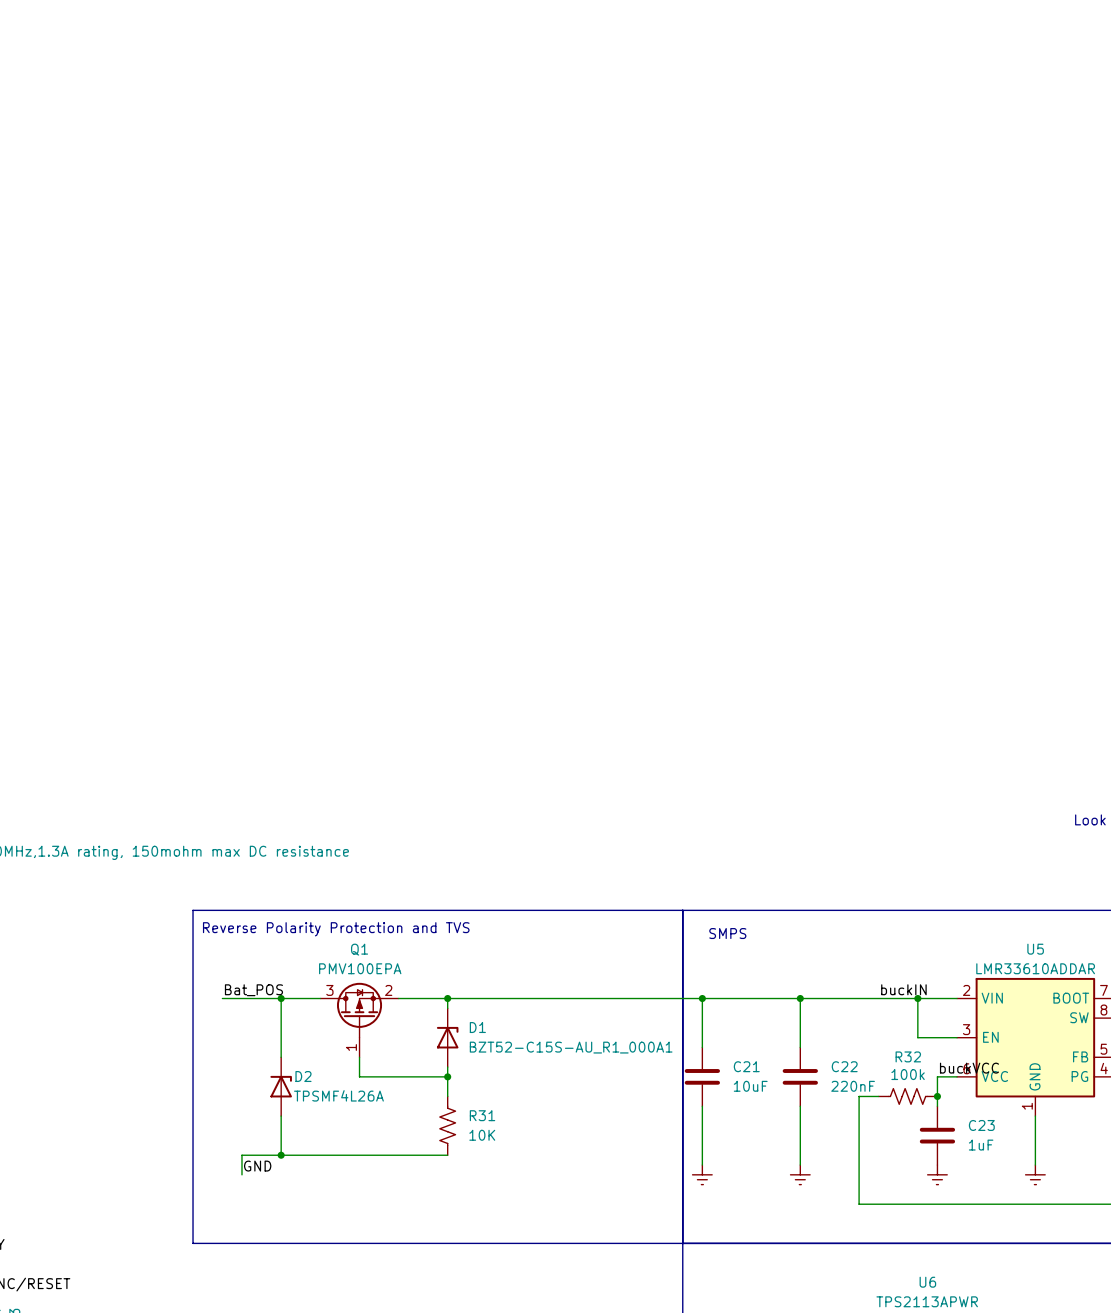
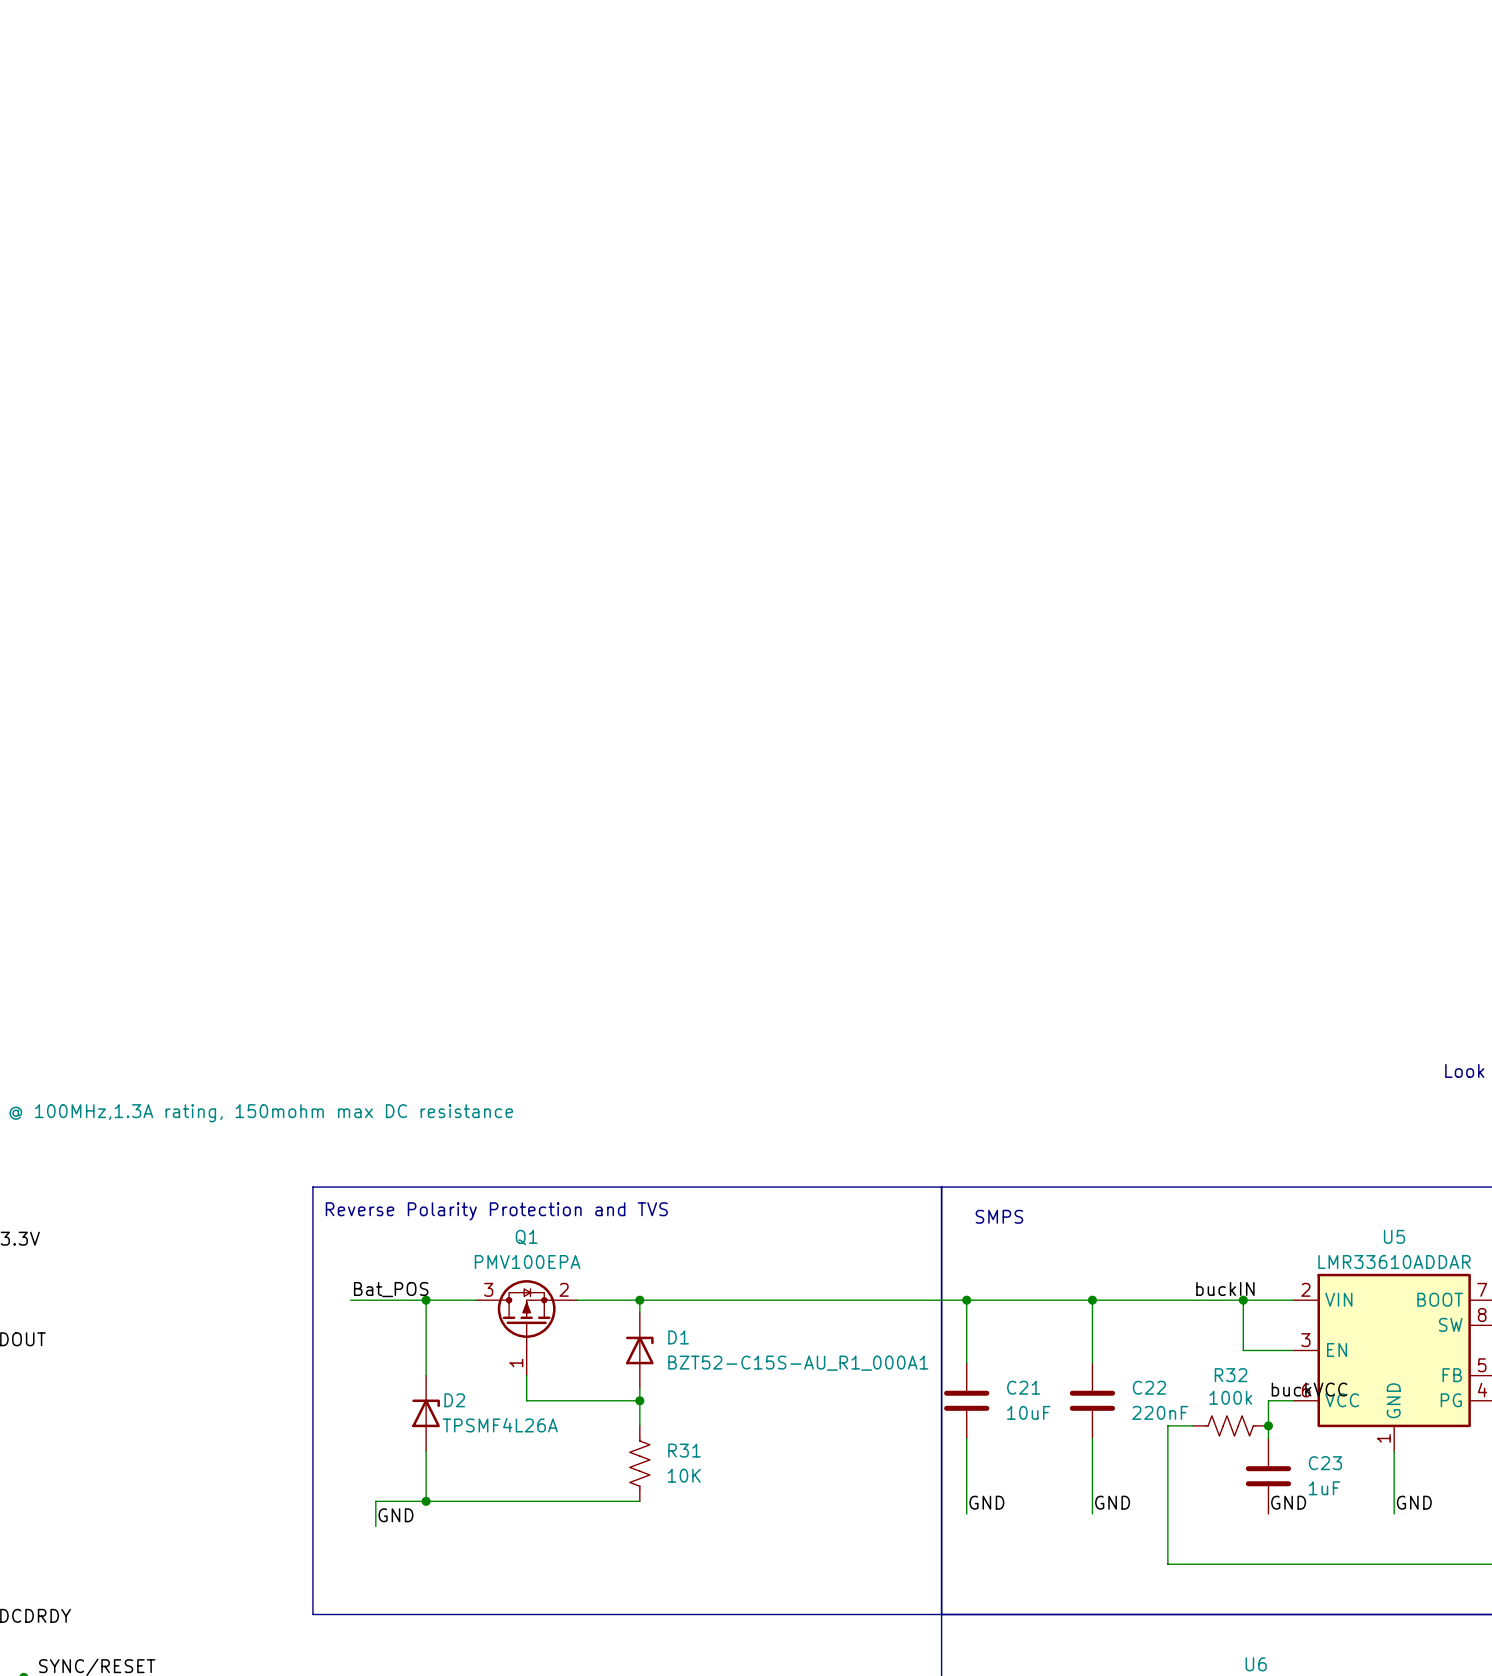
label: none -> GND (986, 1502)
label: none -> GND (1112, 1502)
label: none -> GND (1288, 1502)
label: none -> GND (1414, 1502)
power symbol: (702, 1174) -> none
power symbol: (800, 1174) -> none
power symbol: (937, 1174) -> none
power symbol: (1035, 1174) -> none

